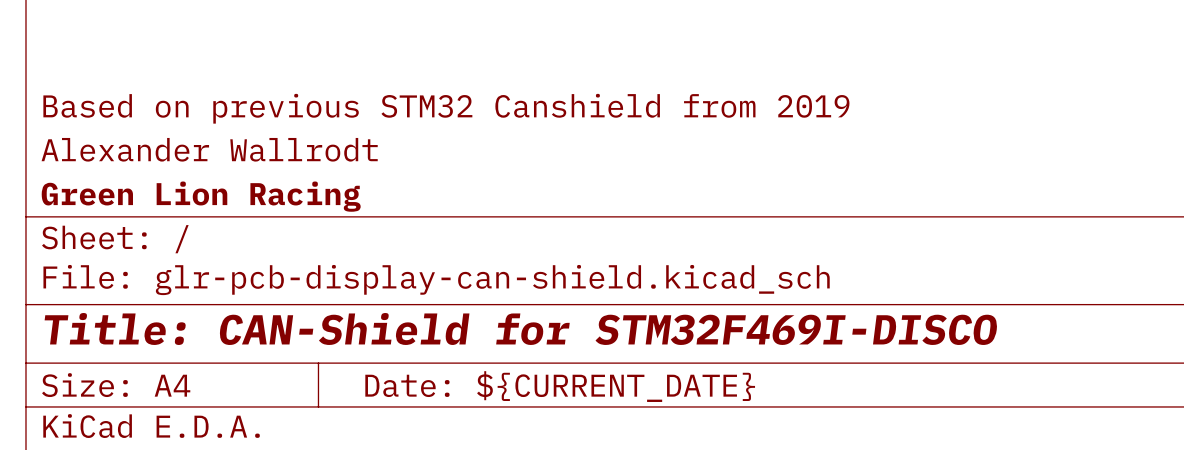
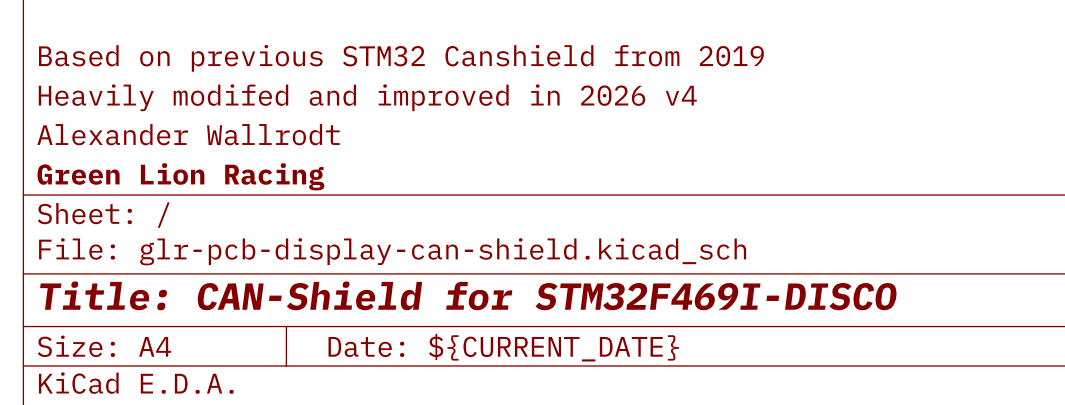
title block: none -> Based on previous STM32 Canshield from 2019 (401, 58)
title block: Based on previous STM32 Canshield from 2019 (446, 108) -> Heavily modifed and improved in 2026 v4 (367, 97)

